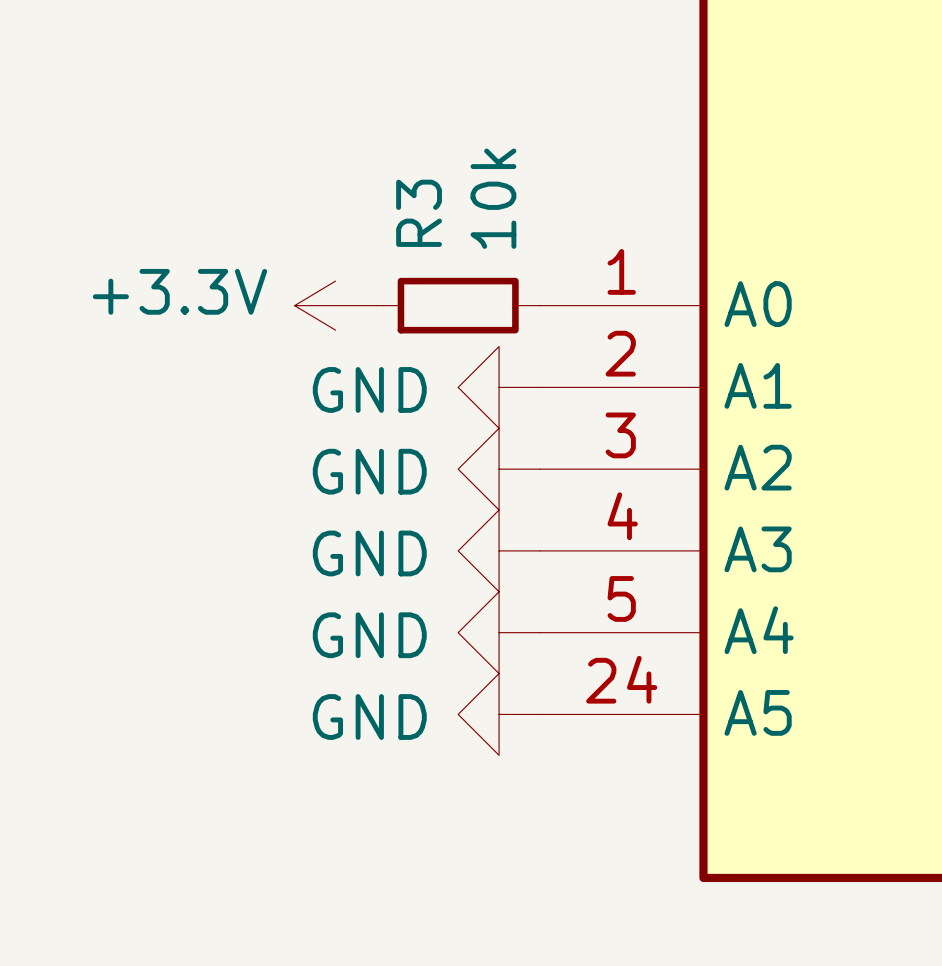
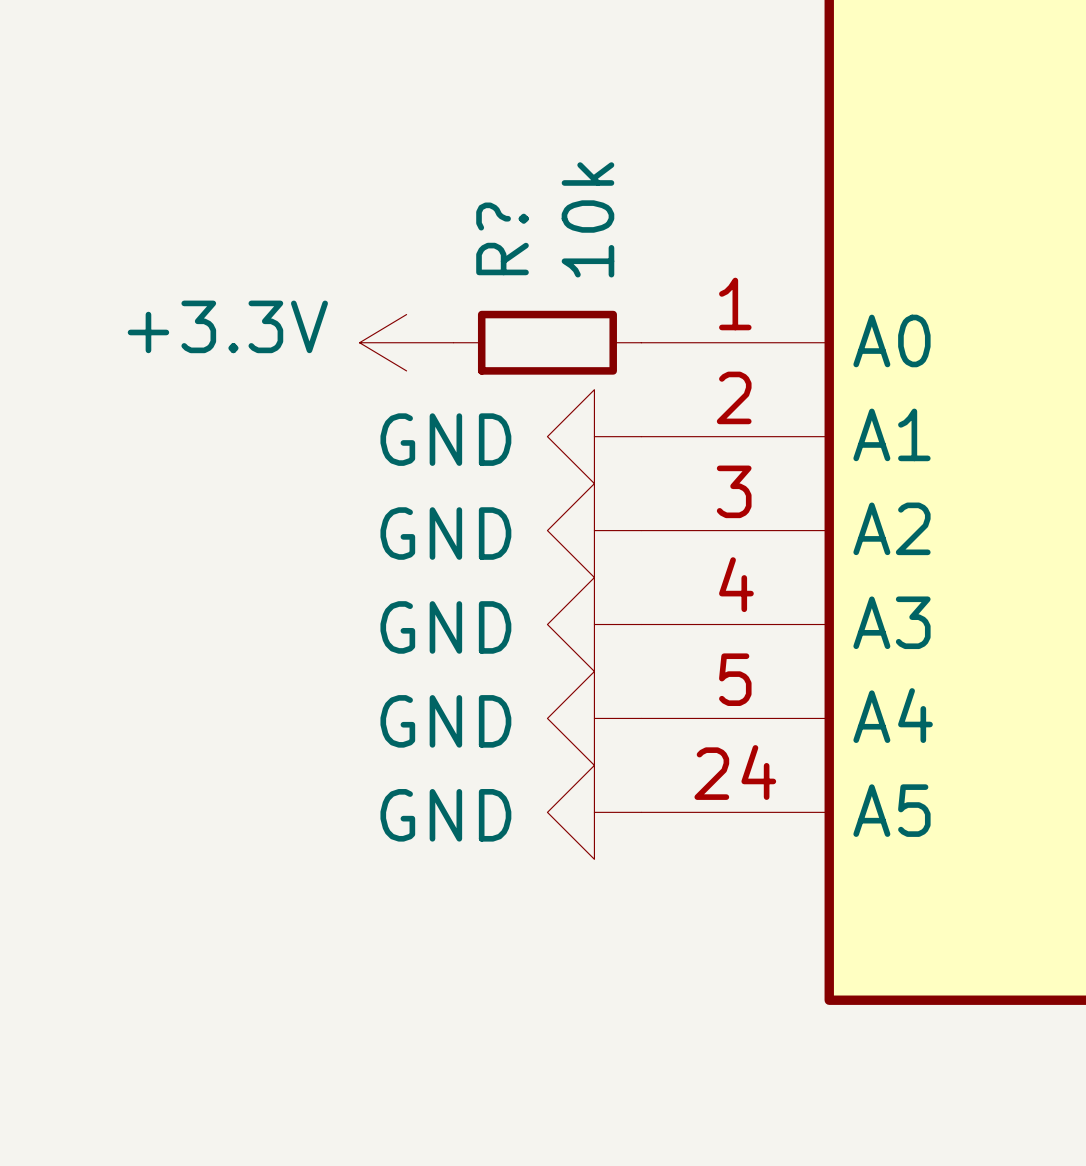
R3 name: R3 (419, 213) -> R? (502, 238)

